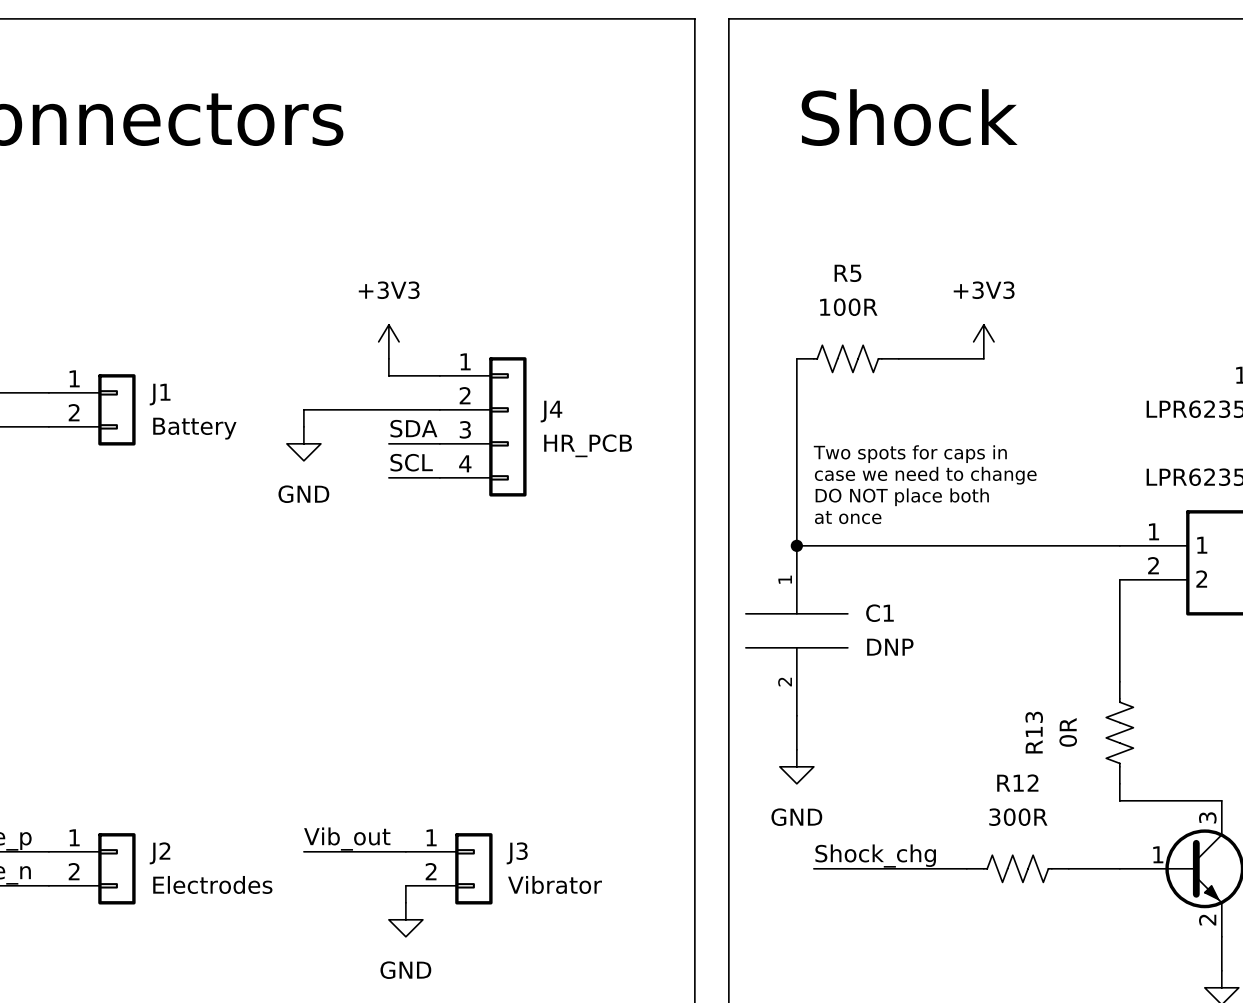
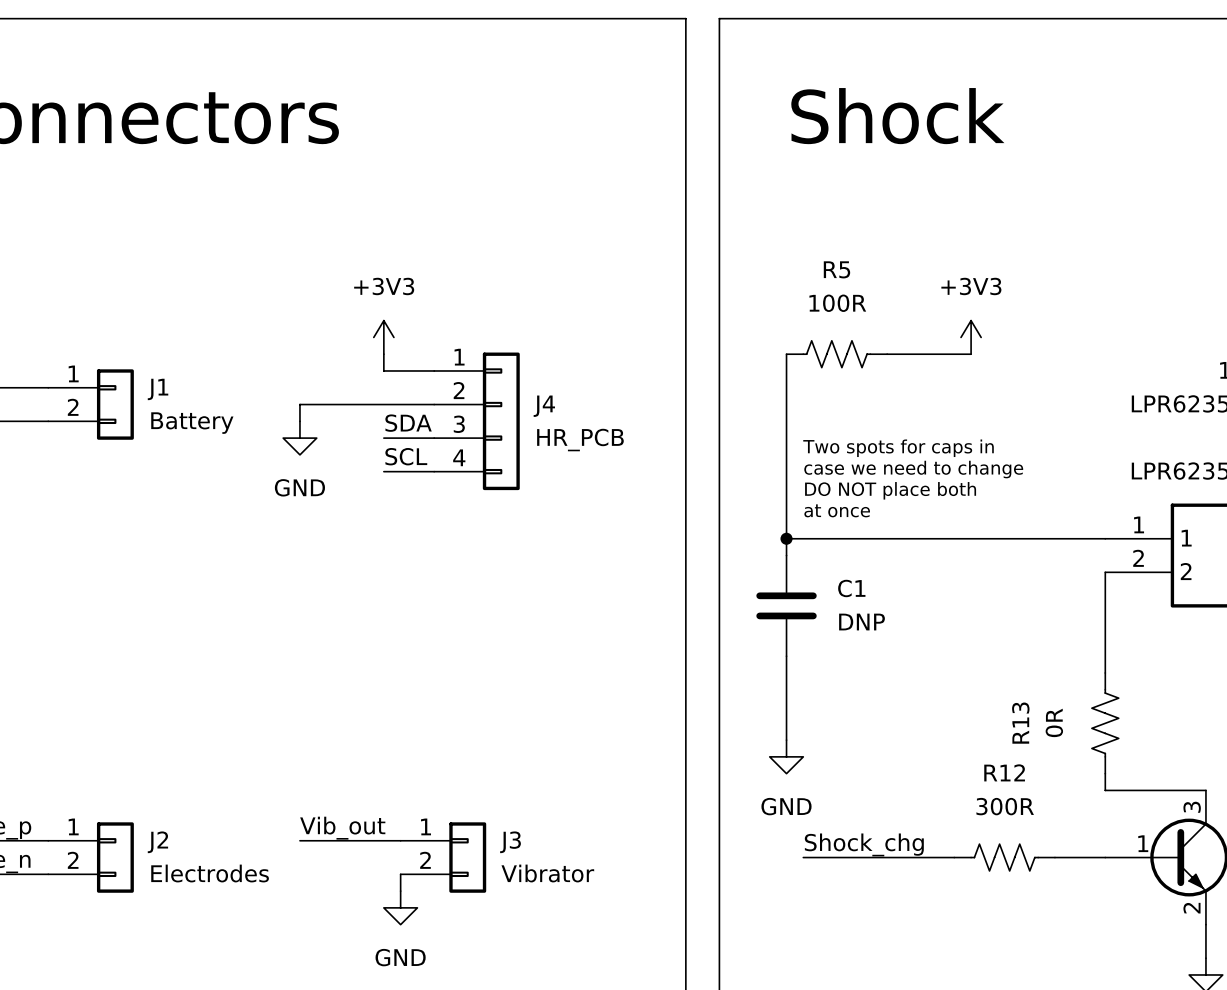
C1 symbol: [745, 545, 848, 716] -> [756, 555, 817, 657]

